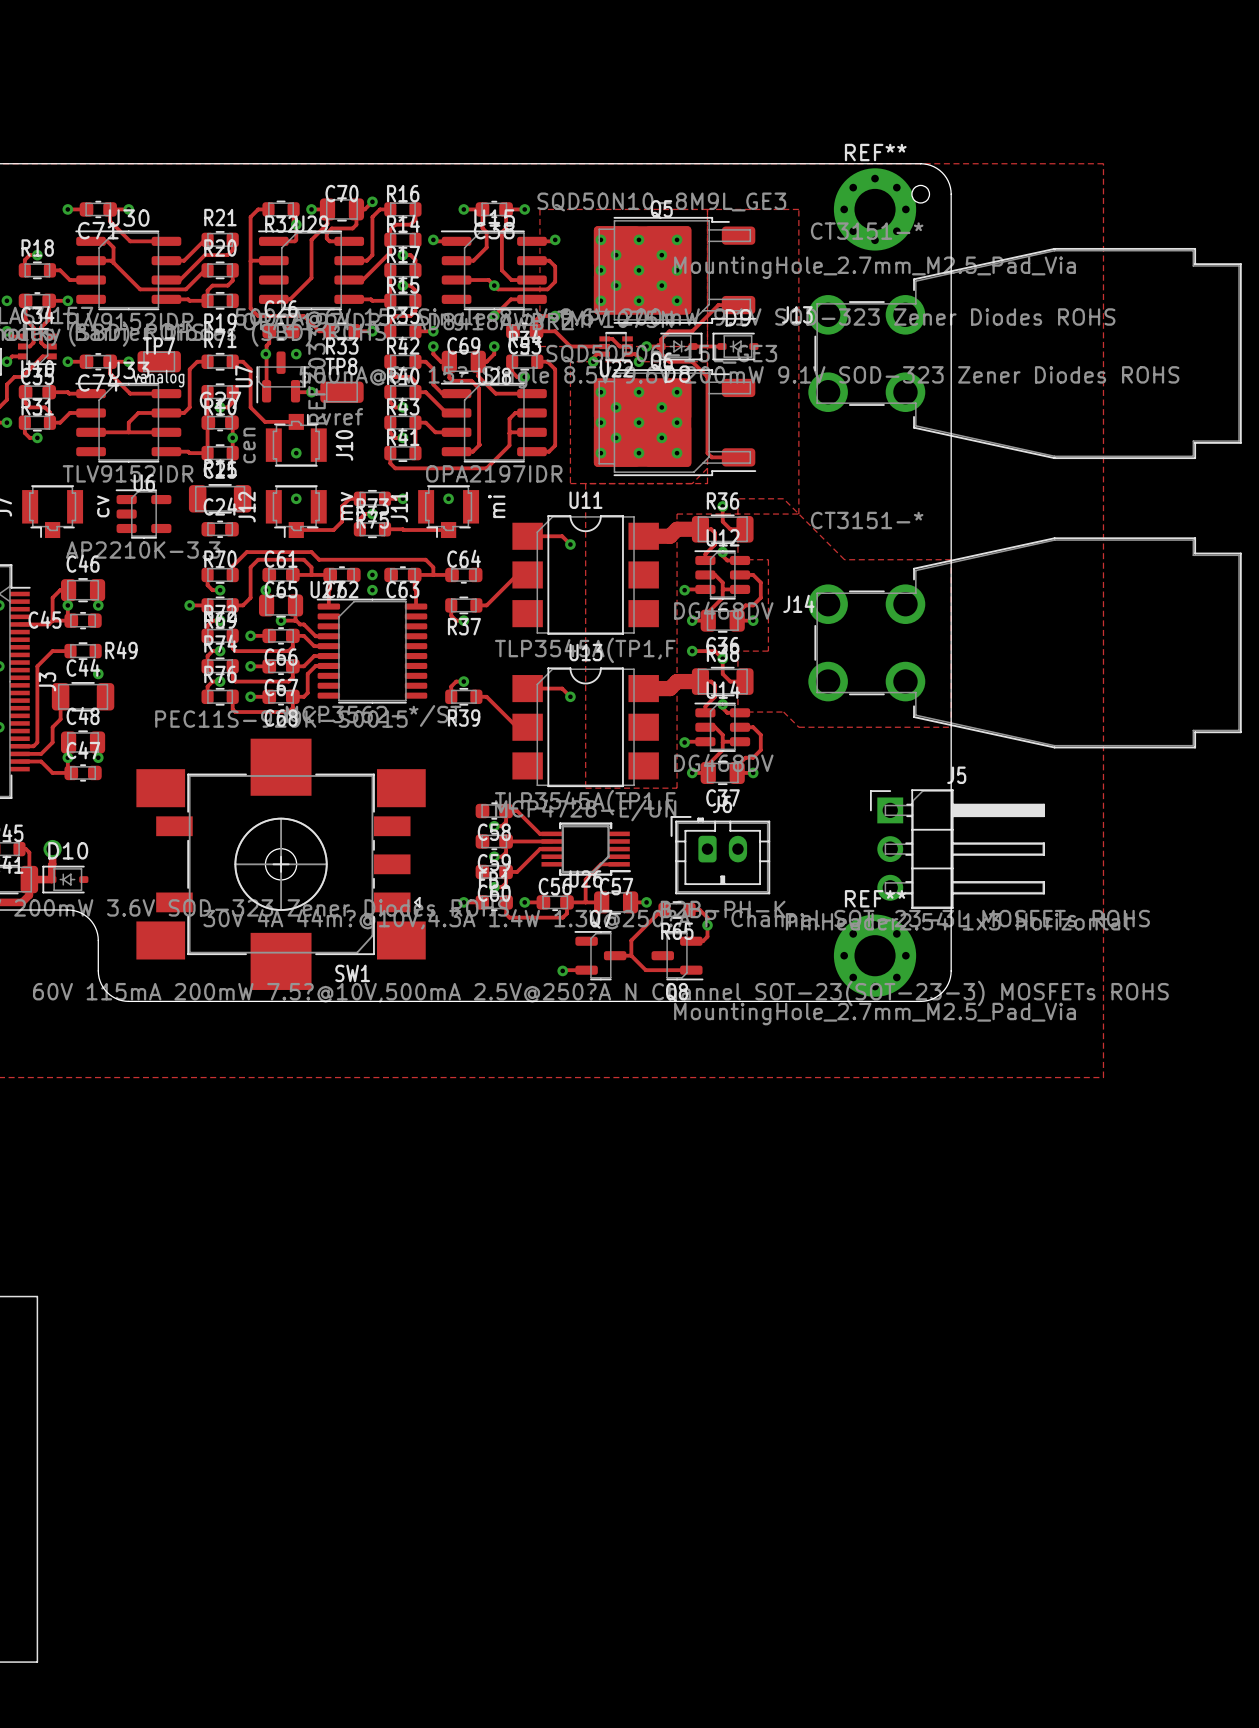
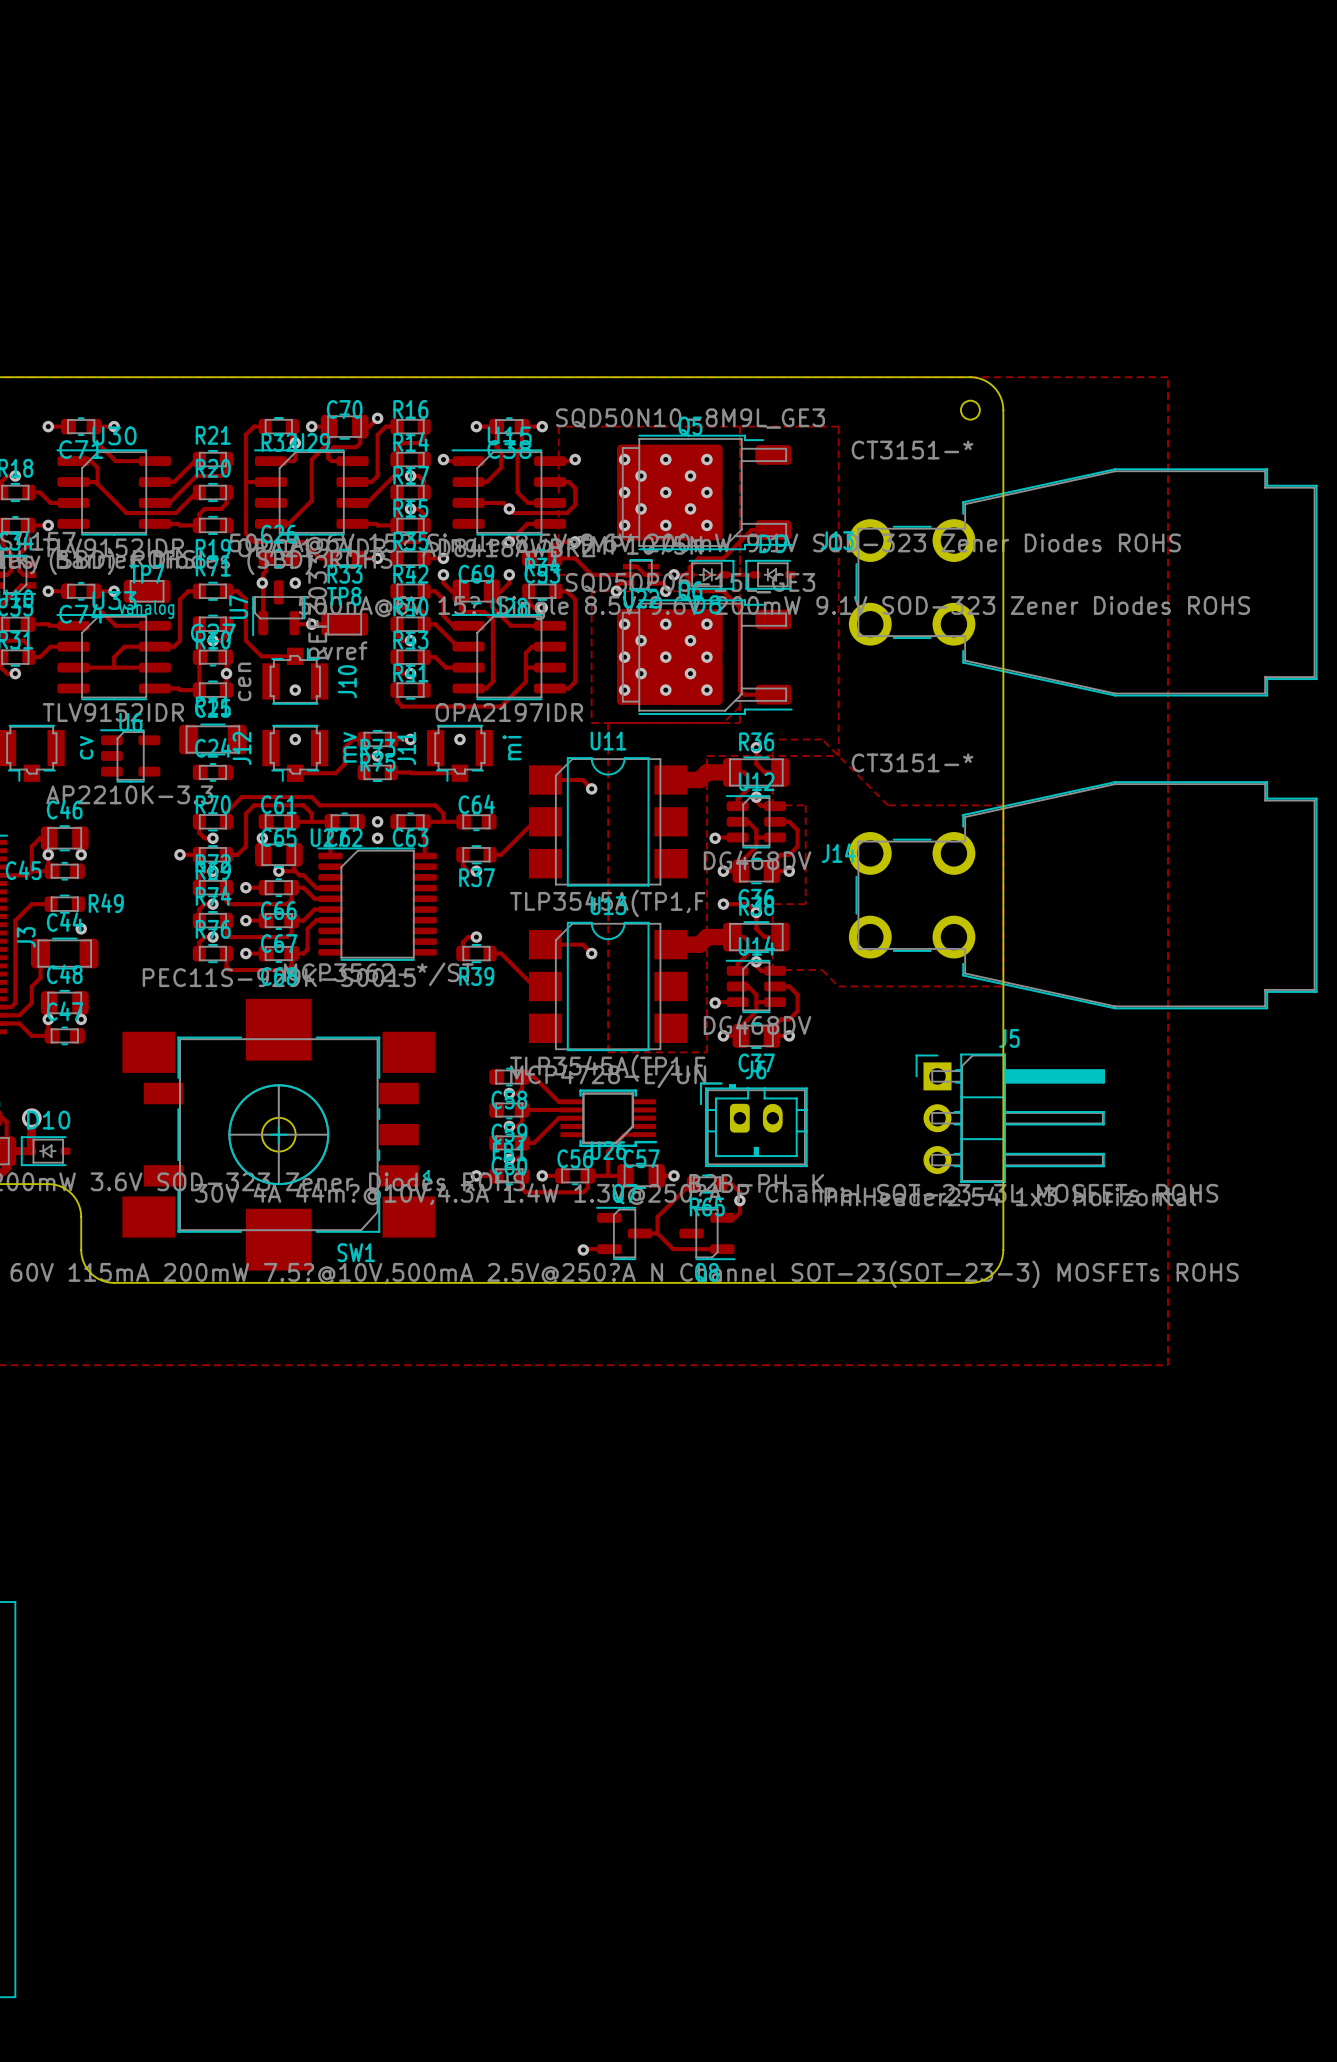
REF**: MountingHole_2.7mm_M2.5_Pad_Via (875, 209) -> none
REF**: MountingHole_2.7mm_M2.5_Pad_Via (875, 955) -> none

